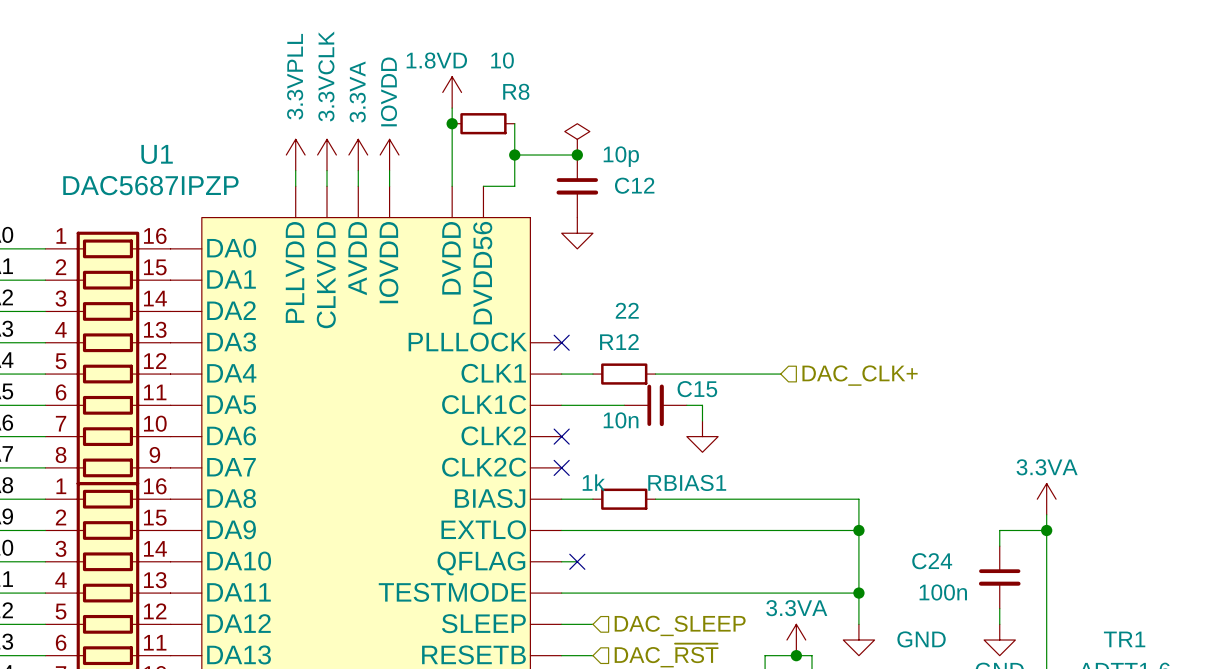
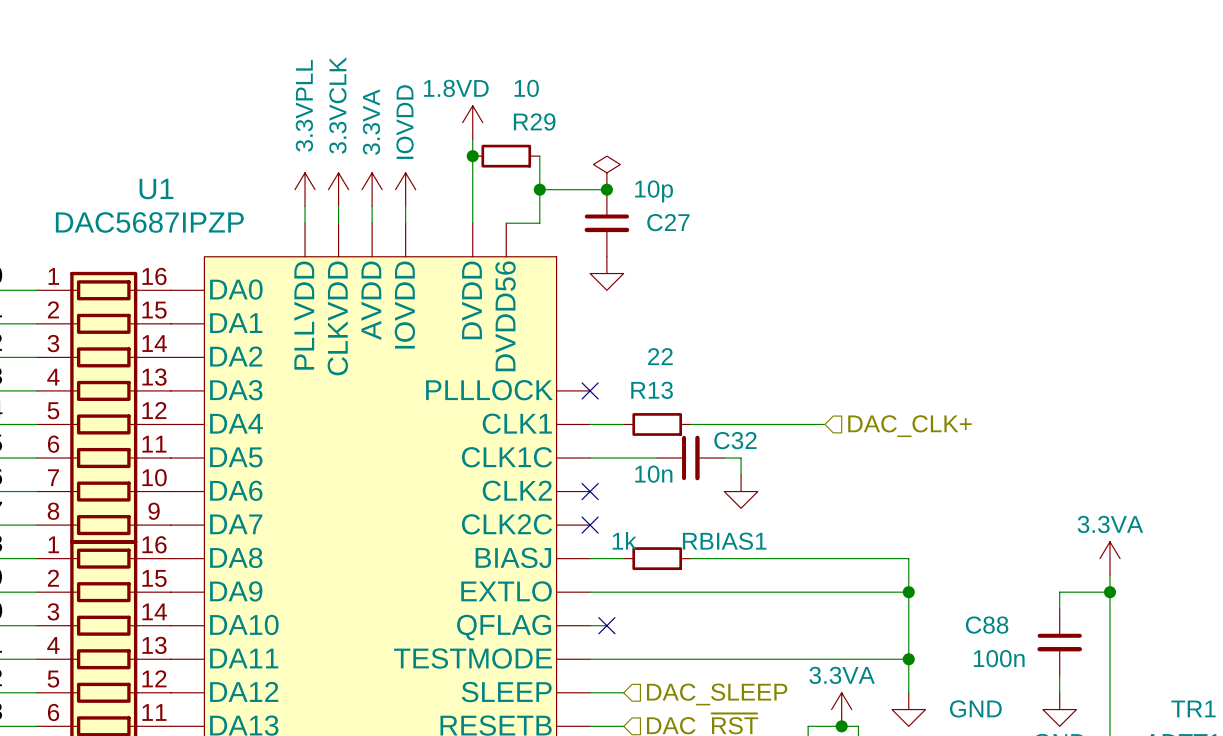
R8 name: R8 (516, 91) -> R29 (534, 121)
C12 name: C12 (634, 185) -> C27 (668, 222)
R12 name: R12 (619, 342) -> R13 (652, 390)
C15 name: C15 (697, 389) -> C32 (735, 440)
C24 name: C24 (932, 561) -> C88 (987, 625)

